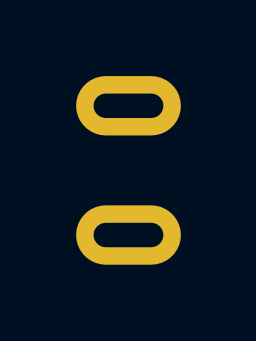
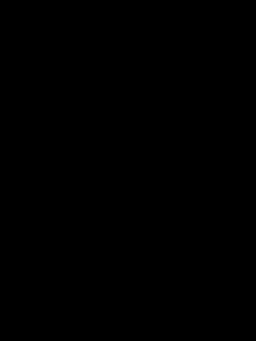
part: (128, 170) -> none

